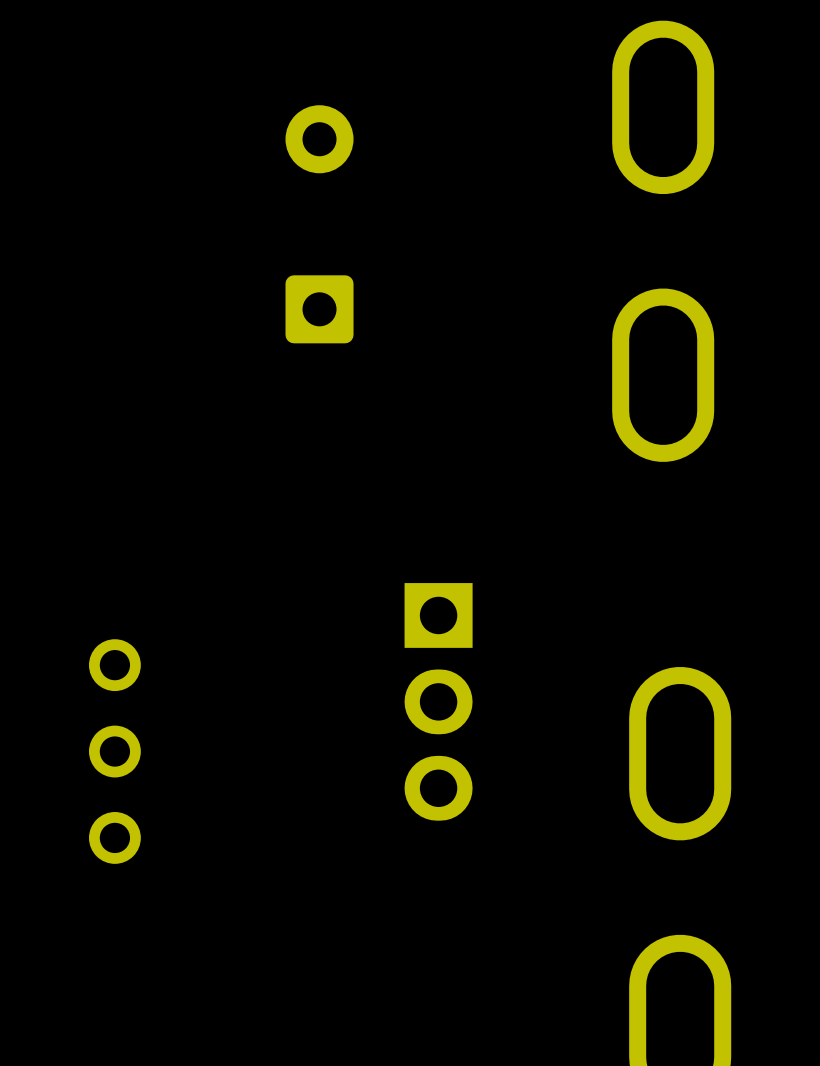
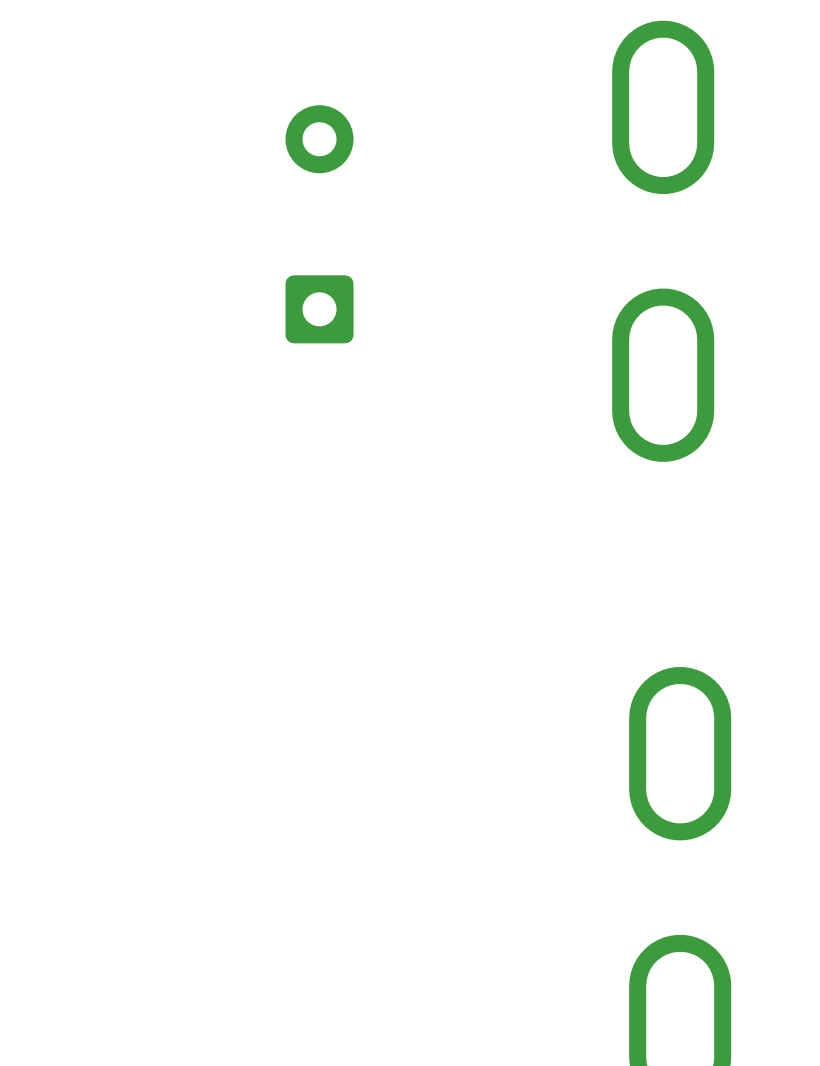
part: (438, 701) -> none
part: (114, 751) -> none

